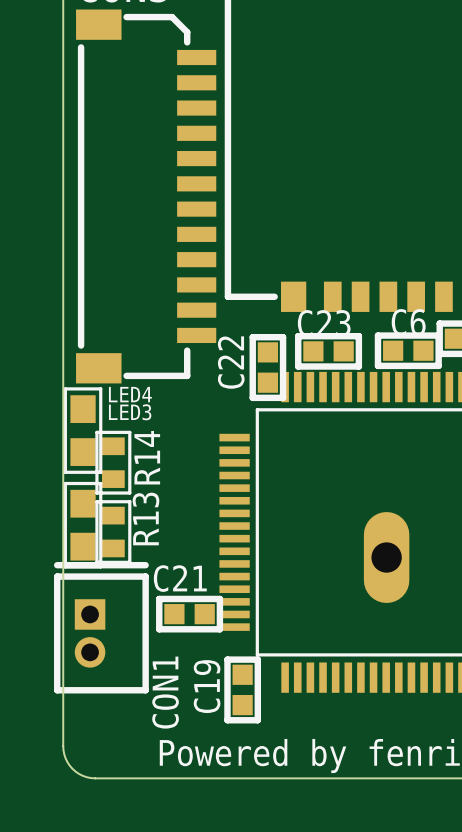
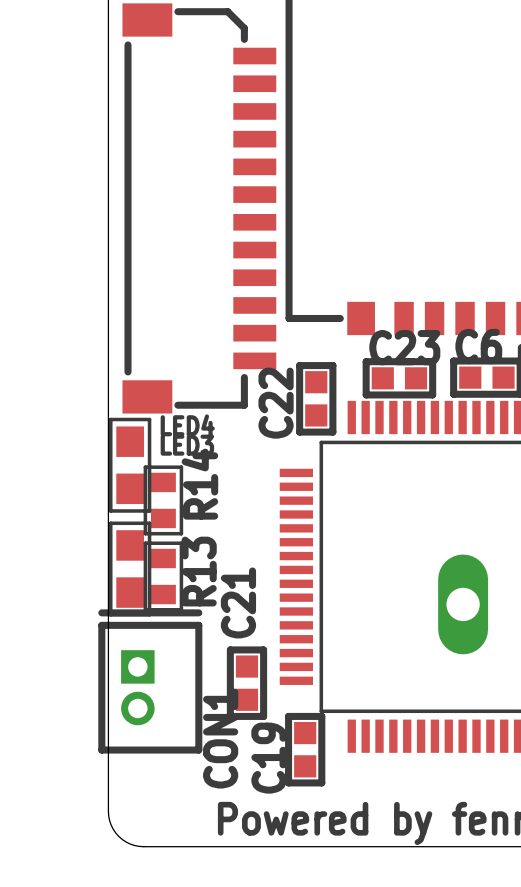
C22 position: (267, 367) -> (316, 398)
C21 rotation: 0° (189, 614) -> 90° clockwise (246, 683)
C19 name position: C19 (207, 686) -> C19 (268, 758)

